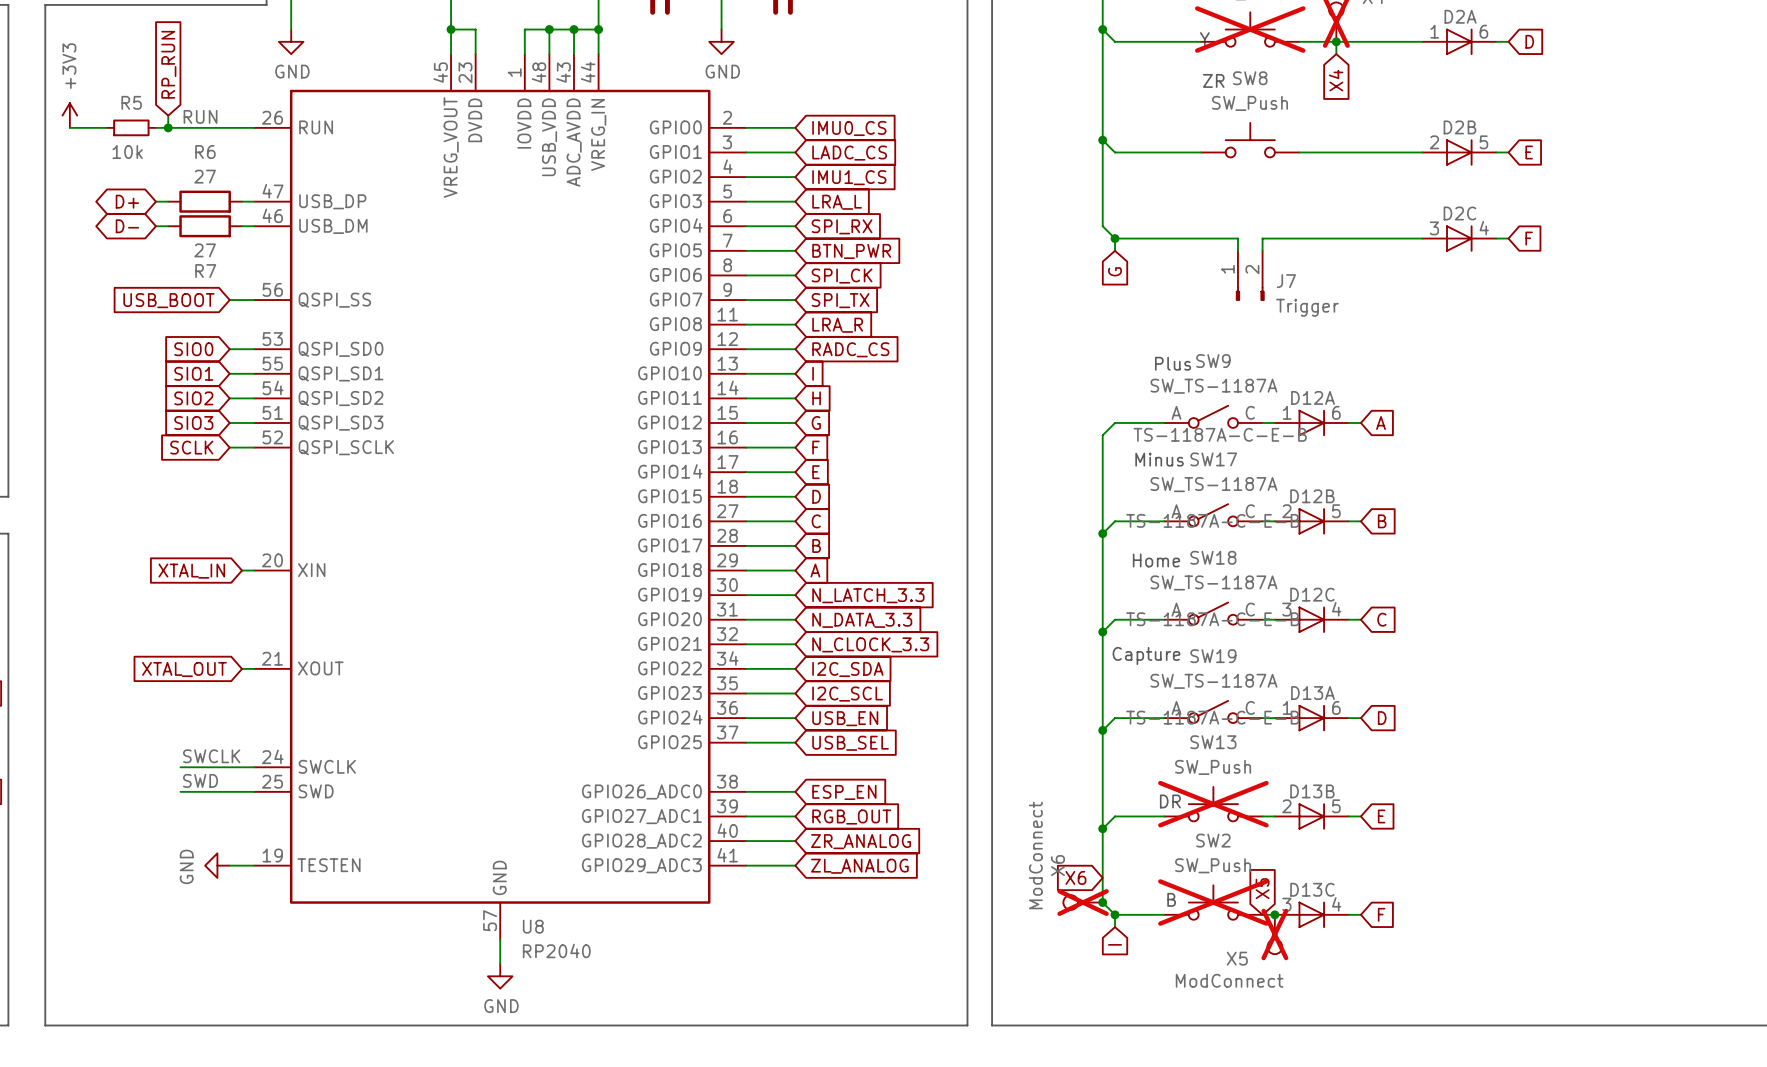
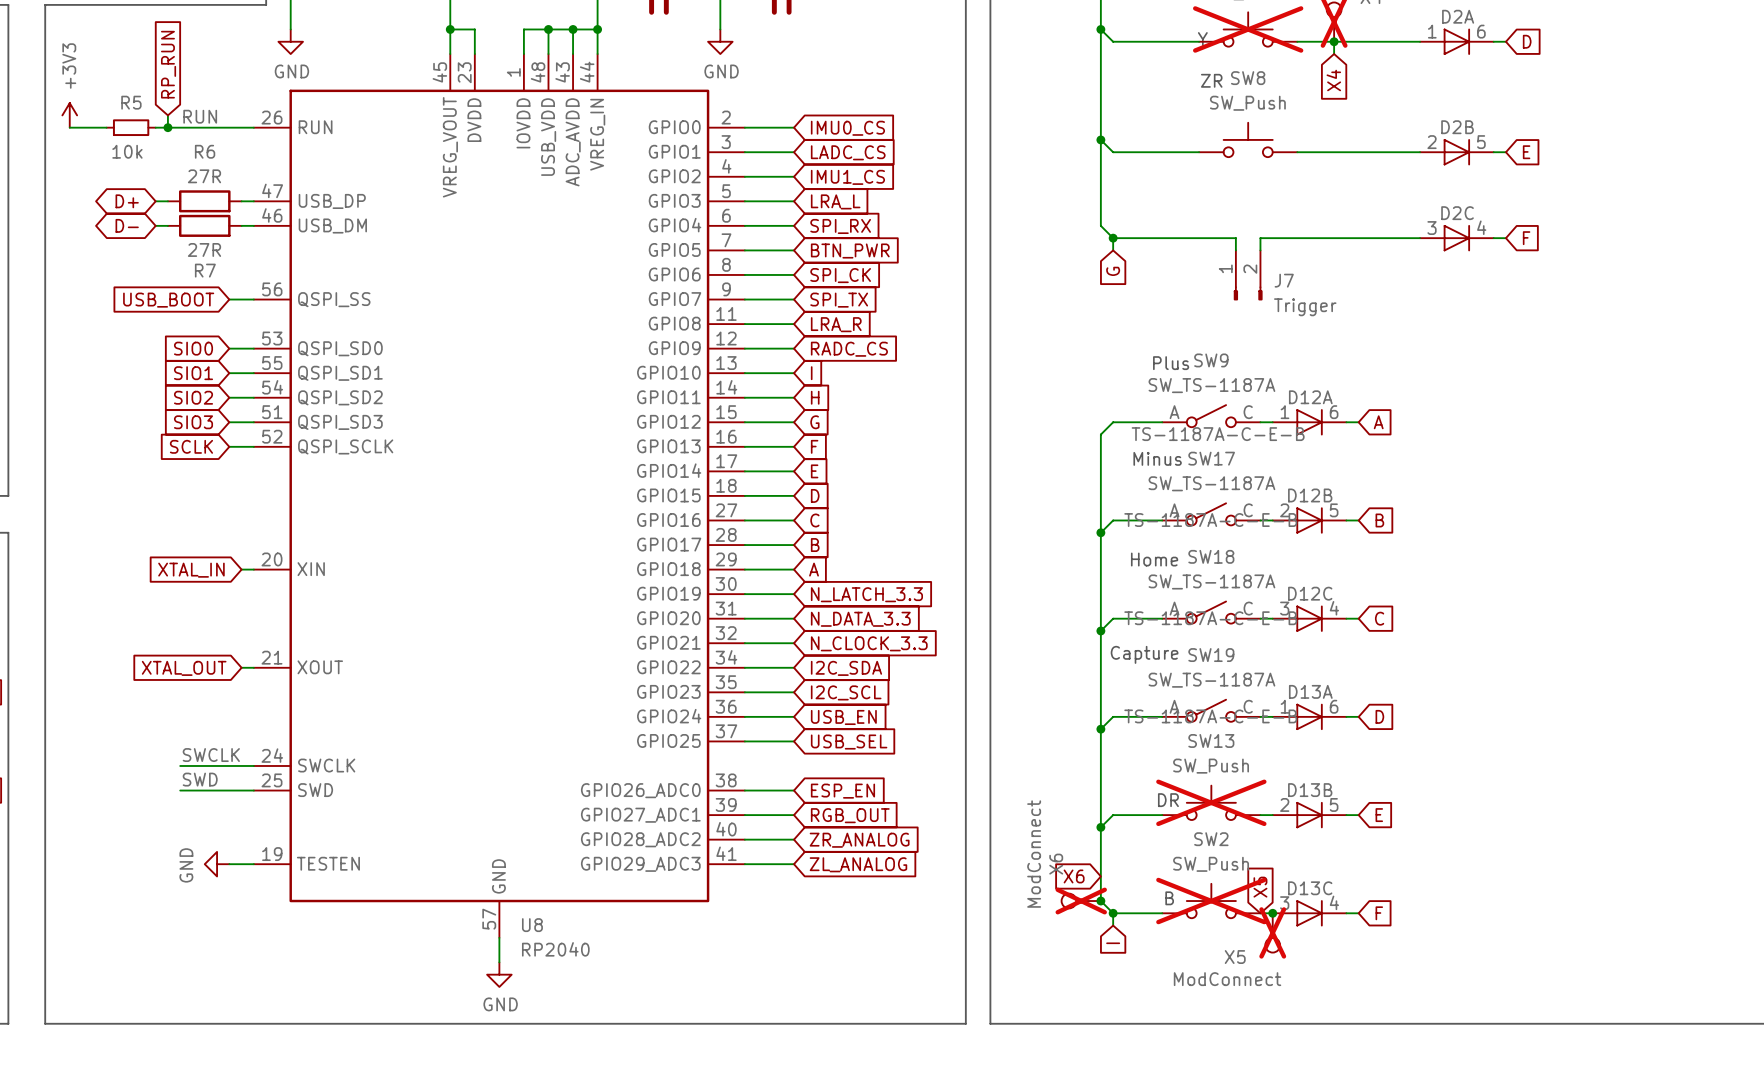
R6 value: 27 (205, 176) -> 27R (204, 176)
R7 value: 27 (205, 250) -> 27R (204, 249)

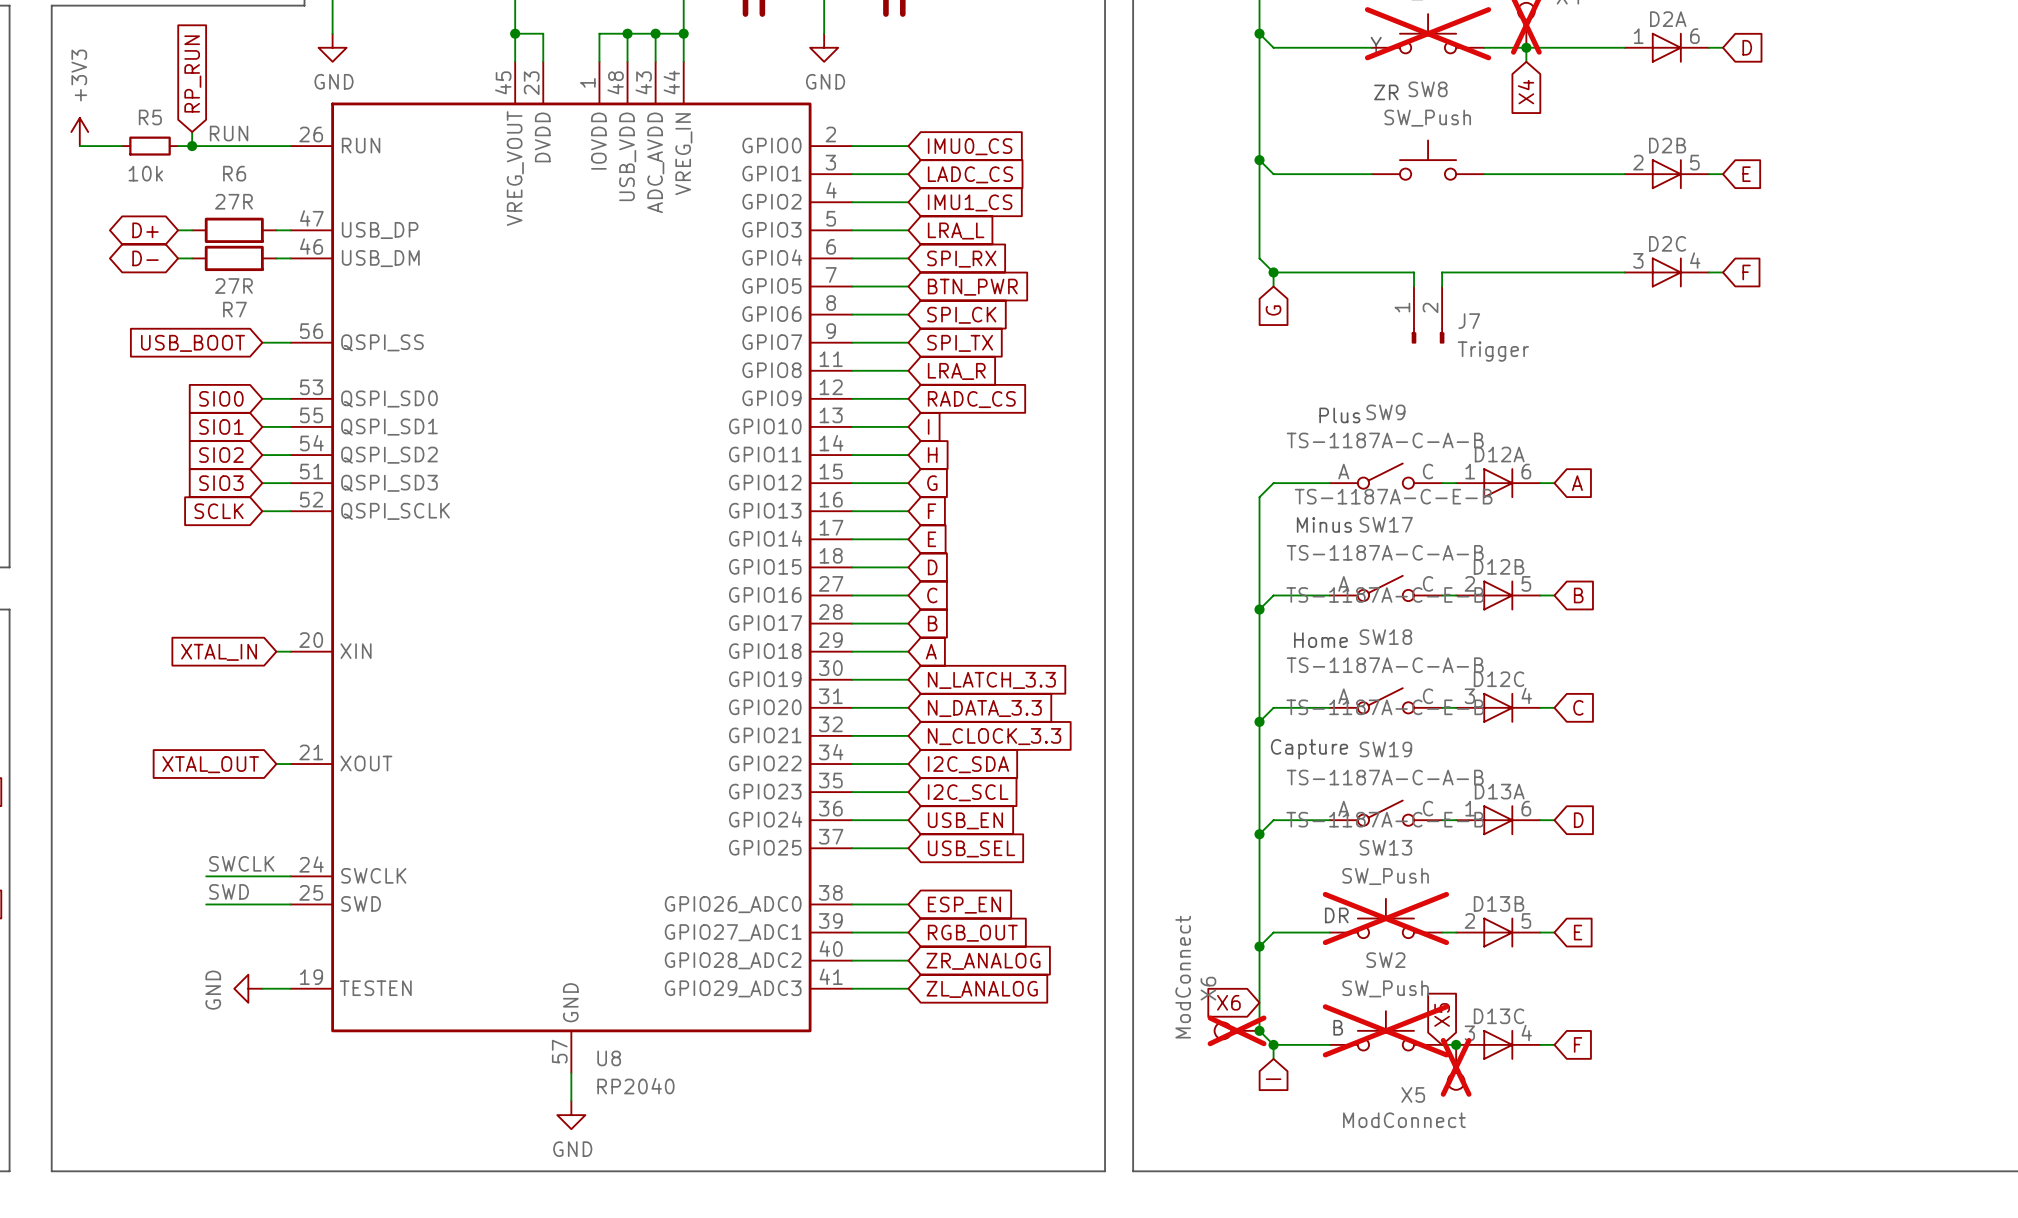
SW9 value: SW_TS-1187A (1211, 385) -> TS-1187A-C-A-B (1385, 440)
SW17 value: SW_TS-1187A (1211, 483) -> TS-1187A-C-A-B (1385, 552)
SW18 value: SW_TS-1187A (1211, 581) -> TS-1187A-C-A-B (1385, 665)
SW19 value: SW_TS-1187A (1211, 680) -> TS-1187A-C-A-B (1385, 777)

